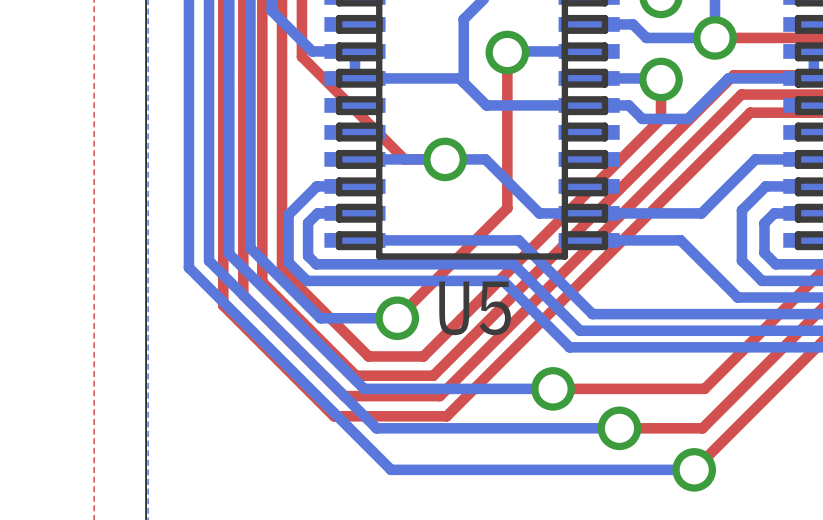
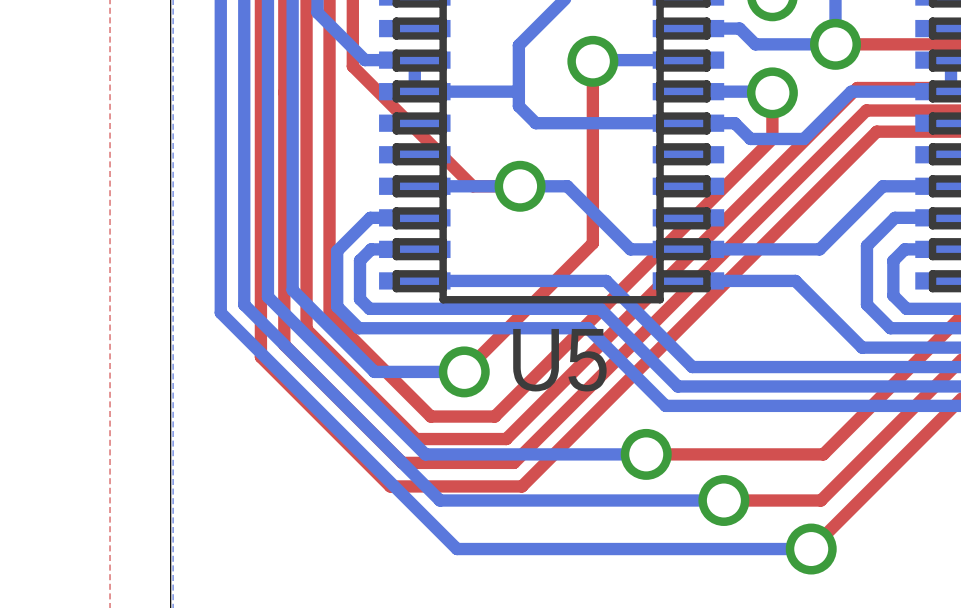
bottom track: (463, 19) (463, 82) -> (541, 22) (518, 45) (518, 106) (535, 123) (568, 123)
bottom track: (444, 78) (459, 78) (486, 105) -> none

